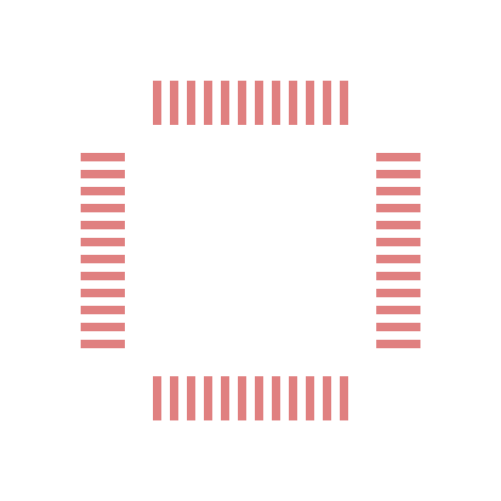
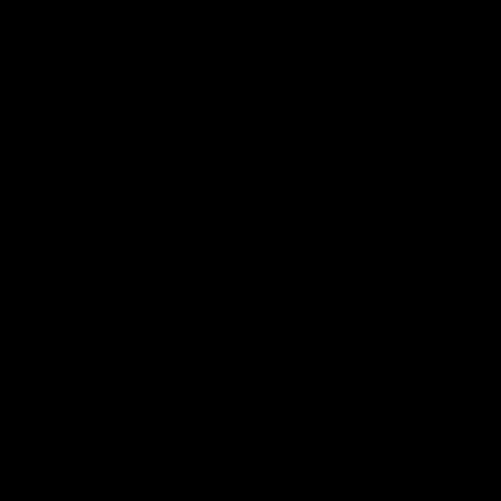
part: (250, 250) -> none

